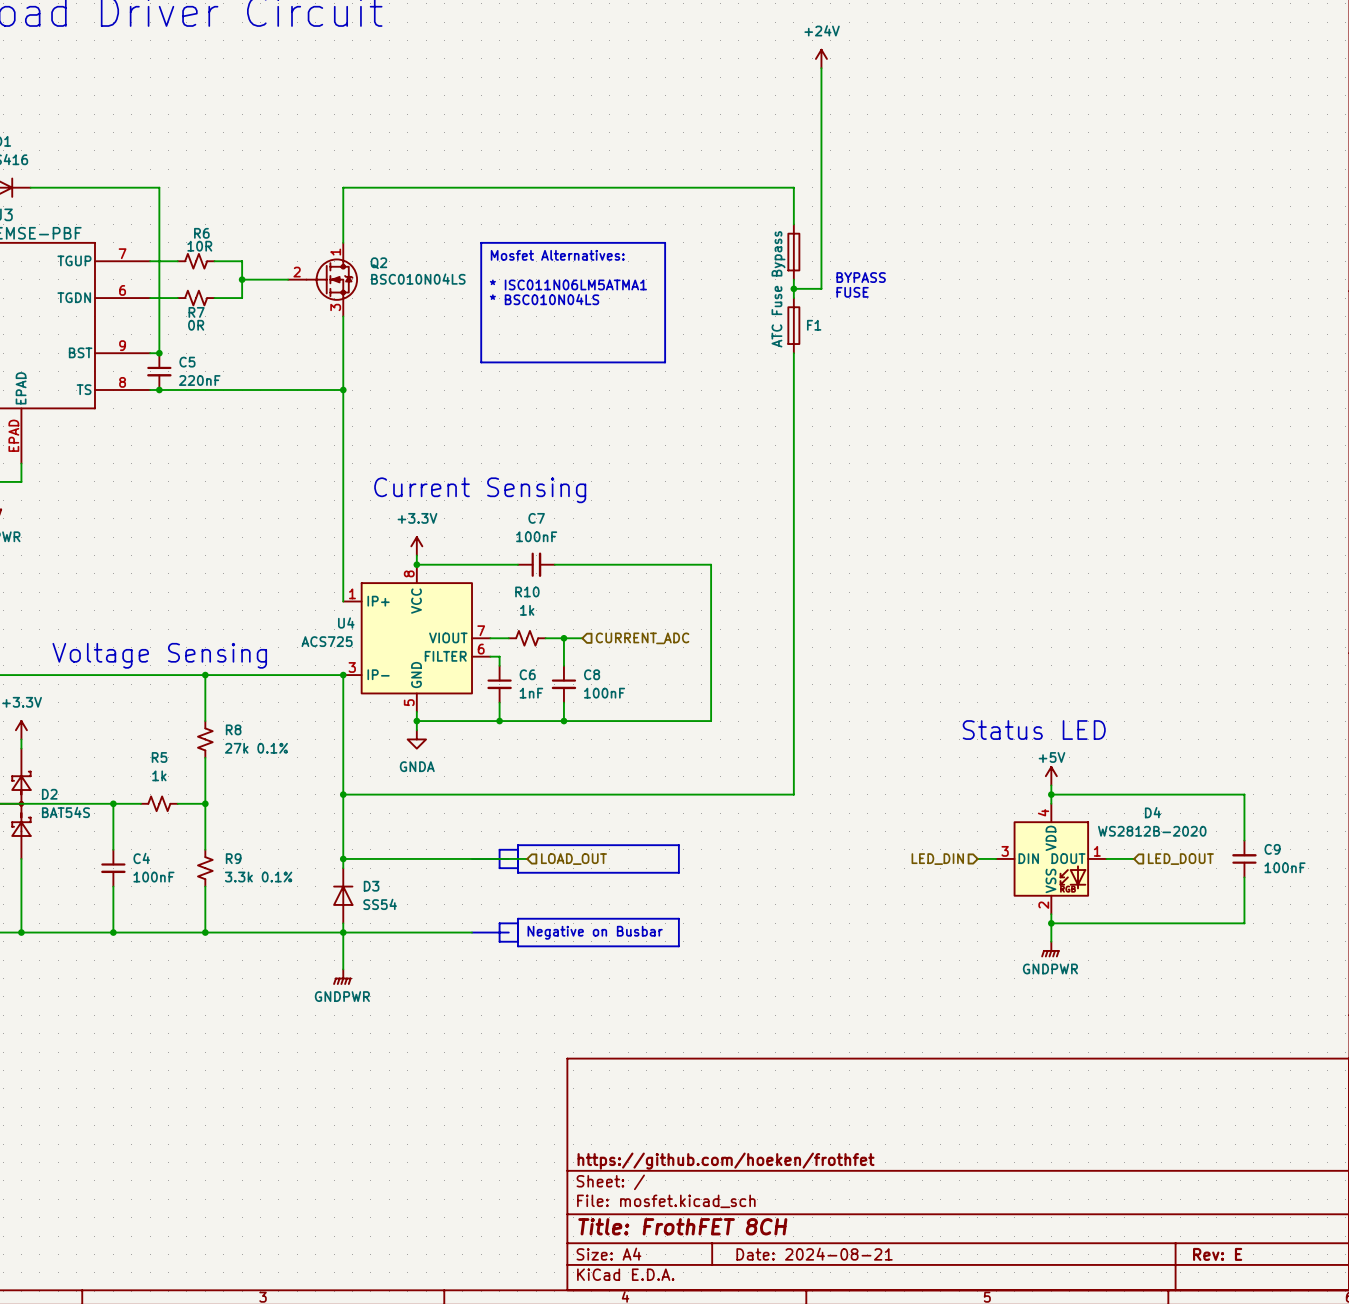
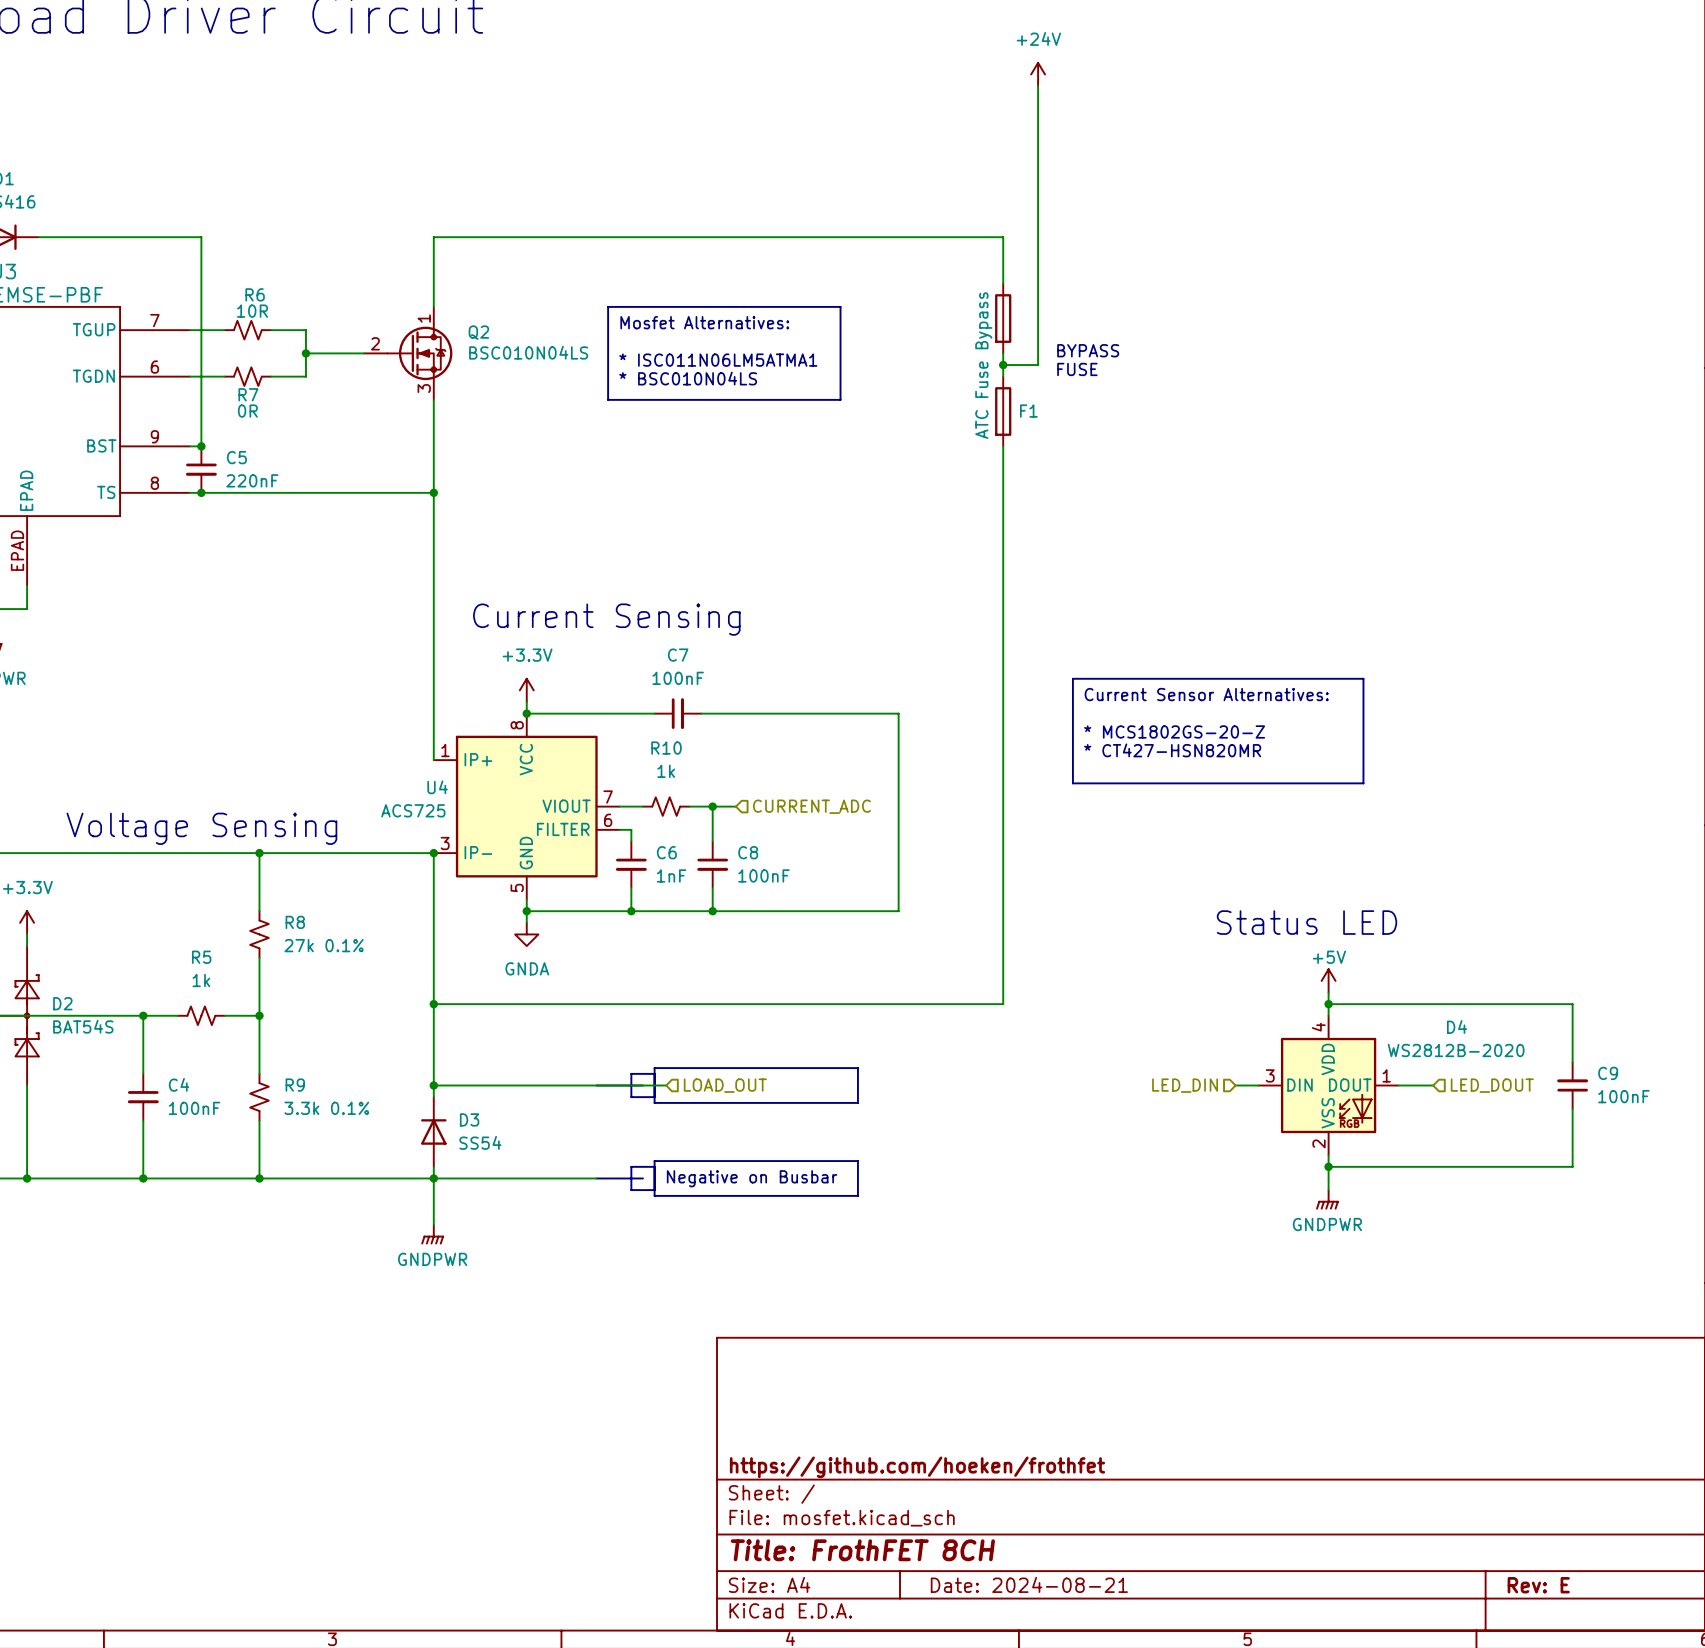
line: (481, 316) (481, 362) (665, 362) (665, 316) -> (608, 399) (840, 399)
line: none -> (1072, 678) (1363, 678) (1363, 783) (1072, 783) (1072, 678)
text: none -> Current Sensor Alternatives: (1206, 694)
text: none -> * MCS1802GS-20-Z (1174, 731)
text: none -> * CT427-HSN820MR (1172, 750)

